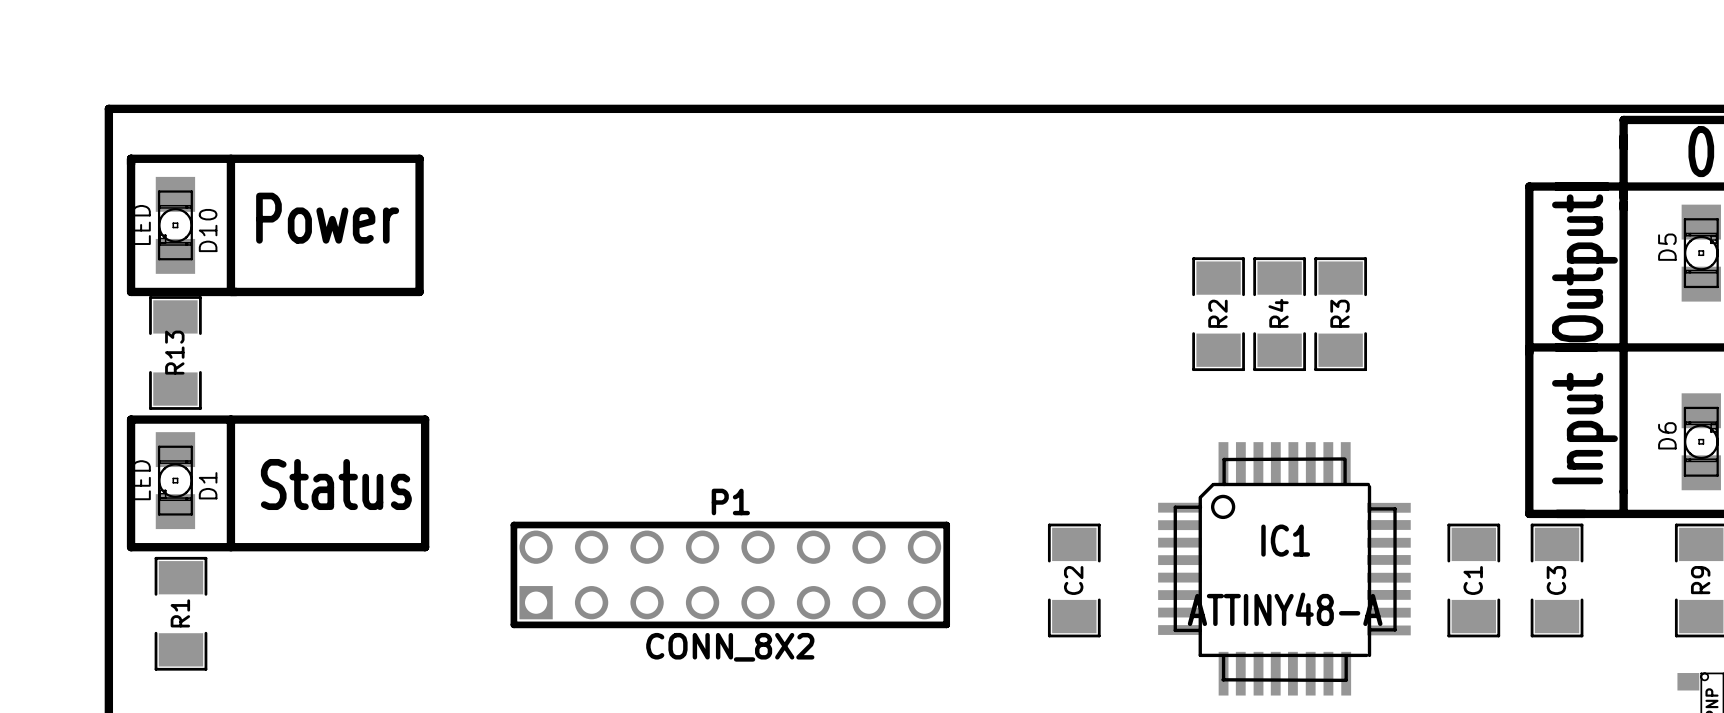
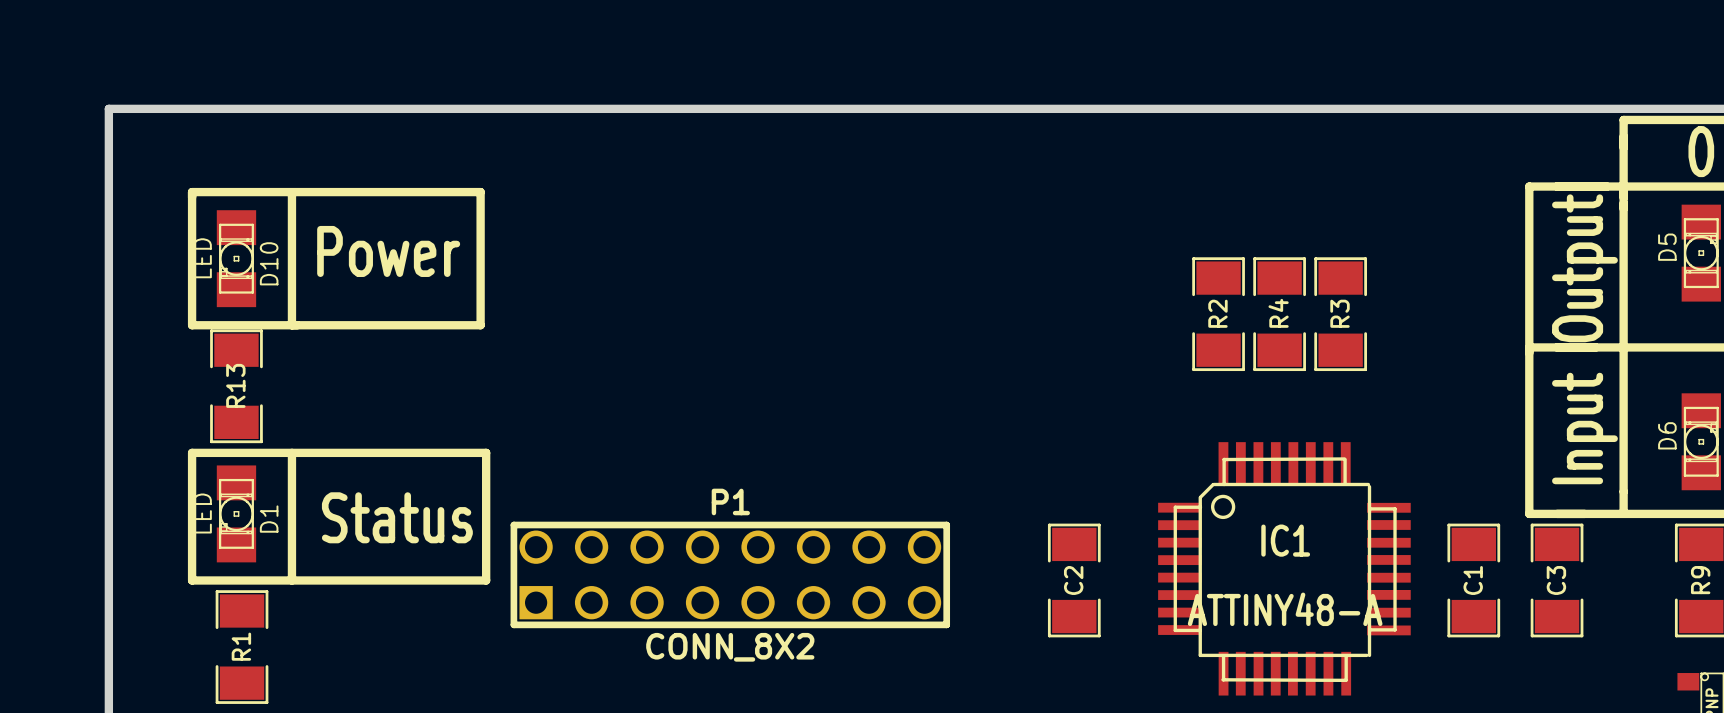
line: (131, 158) (131, 291) (419, 291) (419, 158) (131, 158) -> (192, 192) (192, 325) (480, 325) (480, 192) (192, 192)
line: (230, 158) (230, 291) -> (291, 192) (291, 325)
text position: Power (327, 218) -> Power (388, 251)
D10 position: (175, 225) -> (236, 258)
R13 position: (175, 352) -> (236, 386)
line: (131, 419) (425, 419) (425, 547) (131, 547) (131, 419) -> (192, 452) (486, 452) (486, 580) (192, 580) (192, 452)
line: (230, 419) (230, 547) -> (291, 452) (291, 580)
D1 position: (175, 480) -> (236, 513)
text position: Status (336, 484) -> Status (397, 517)
R1 position: (180, 613) -> (242, 647)

